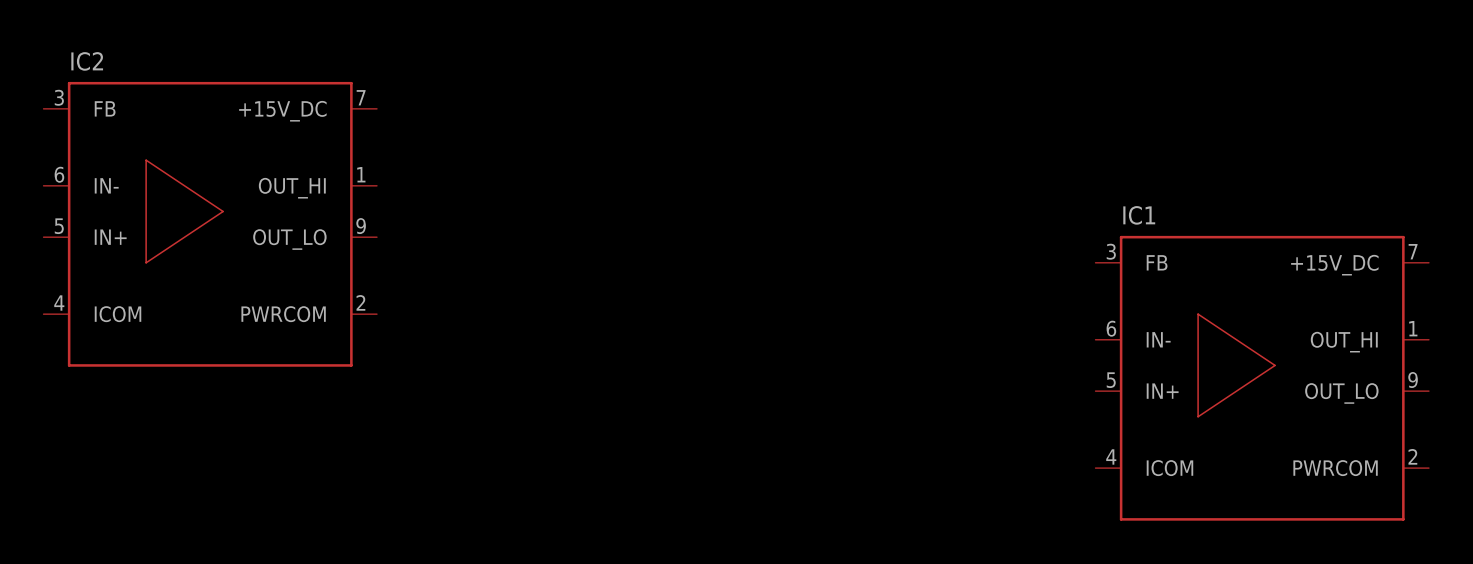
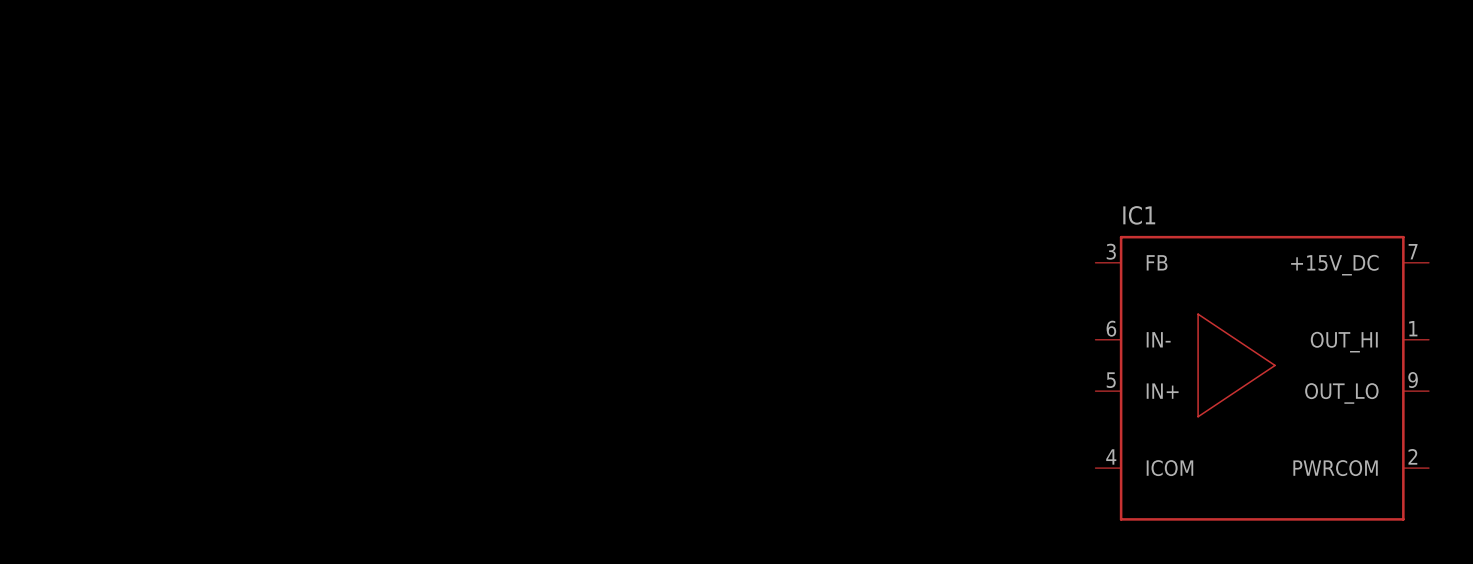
IC2: (210, 224) -> none

